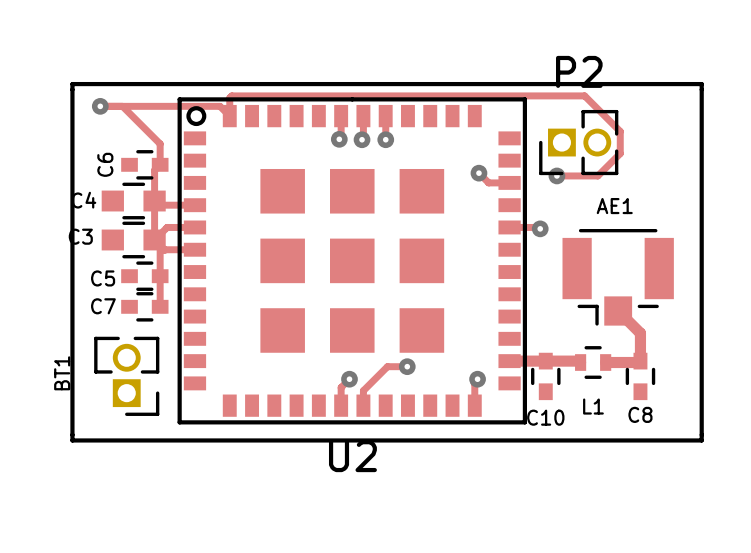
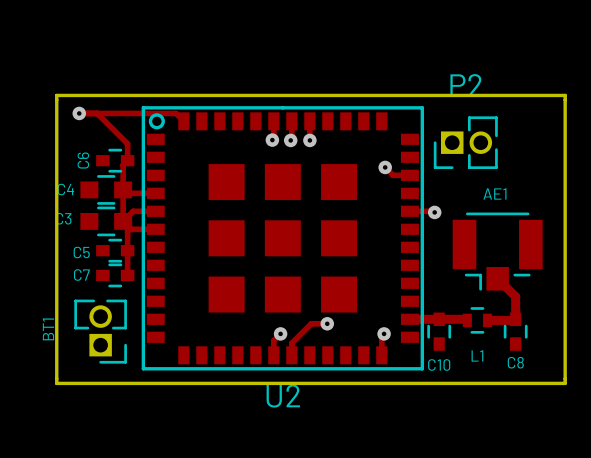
track: (229, 116) (229, 97) (231, 95) (584, 95) (620, 131) (620, 153) (597, 175) (556, 175) -> none
via: (556, 175) -> none

